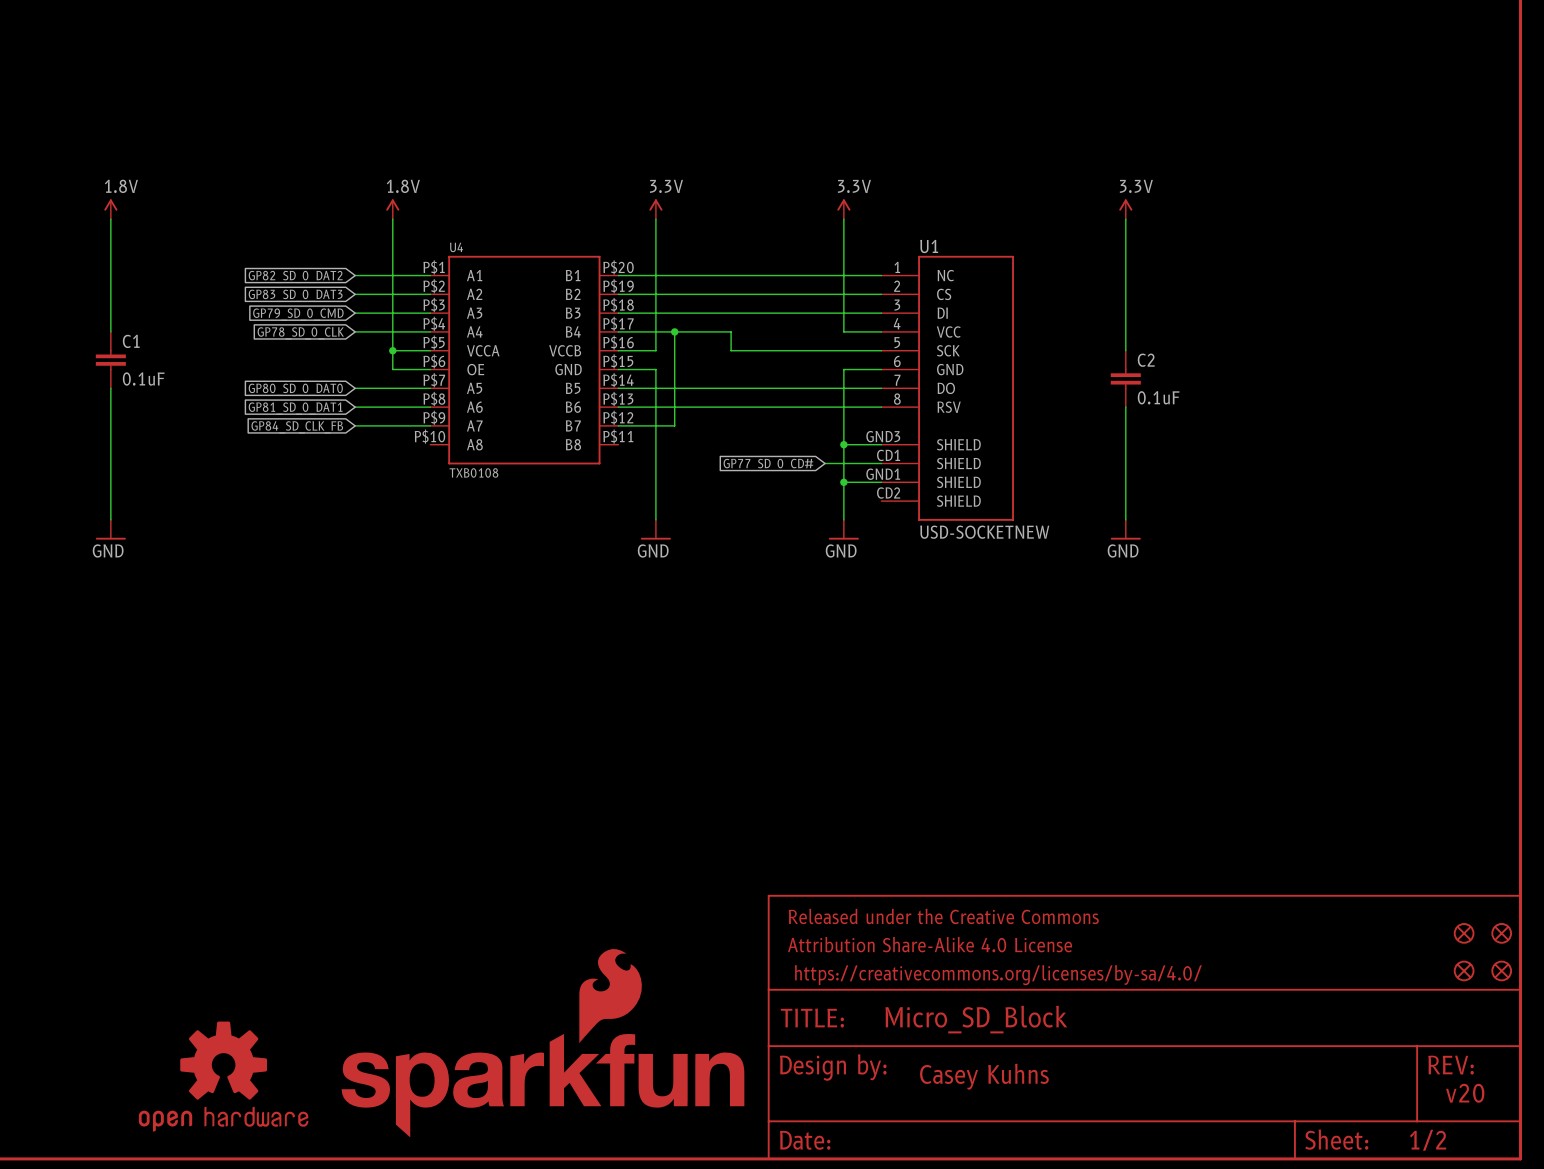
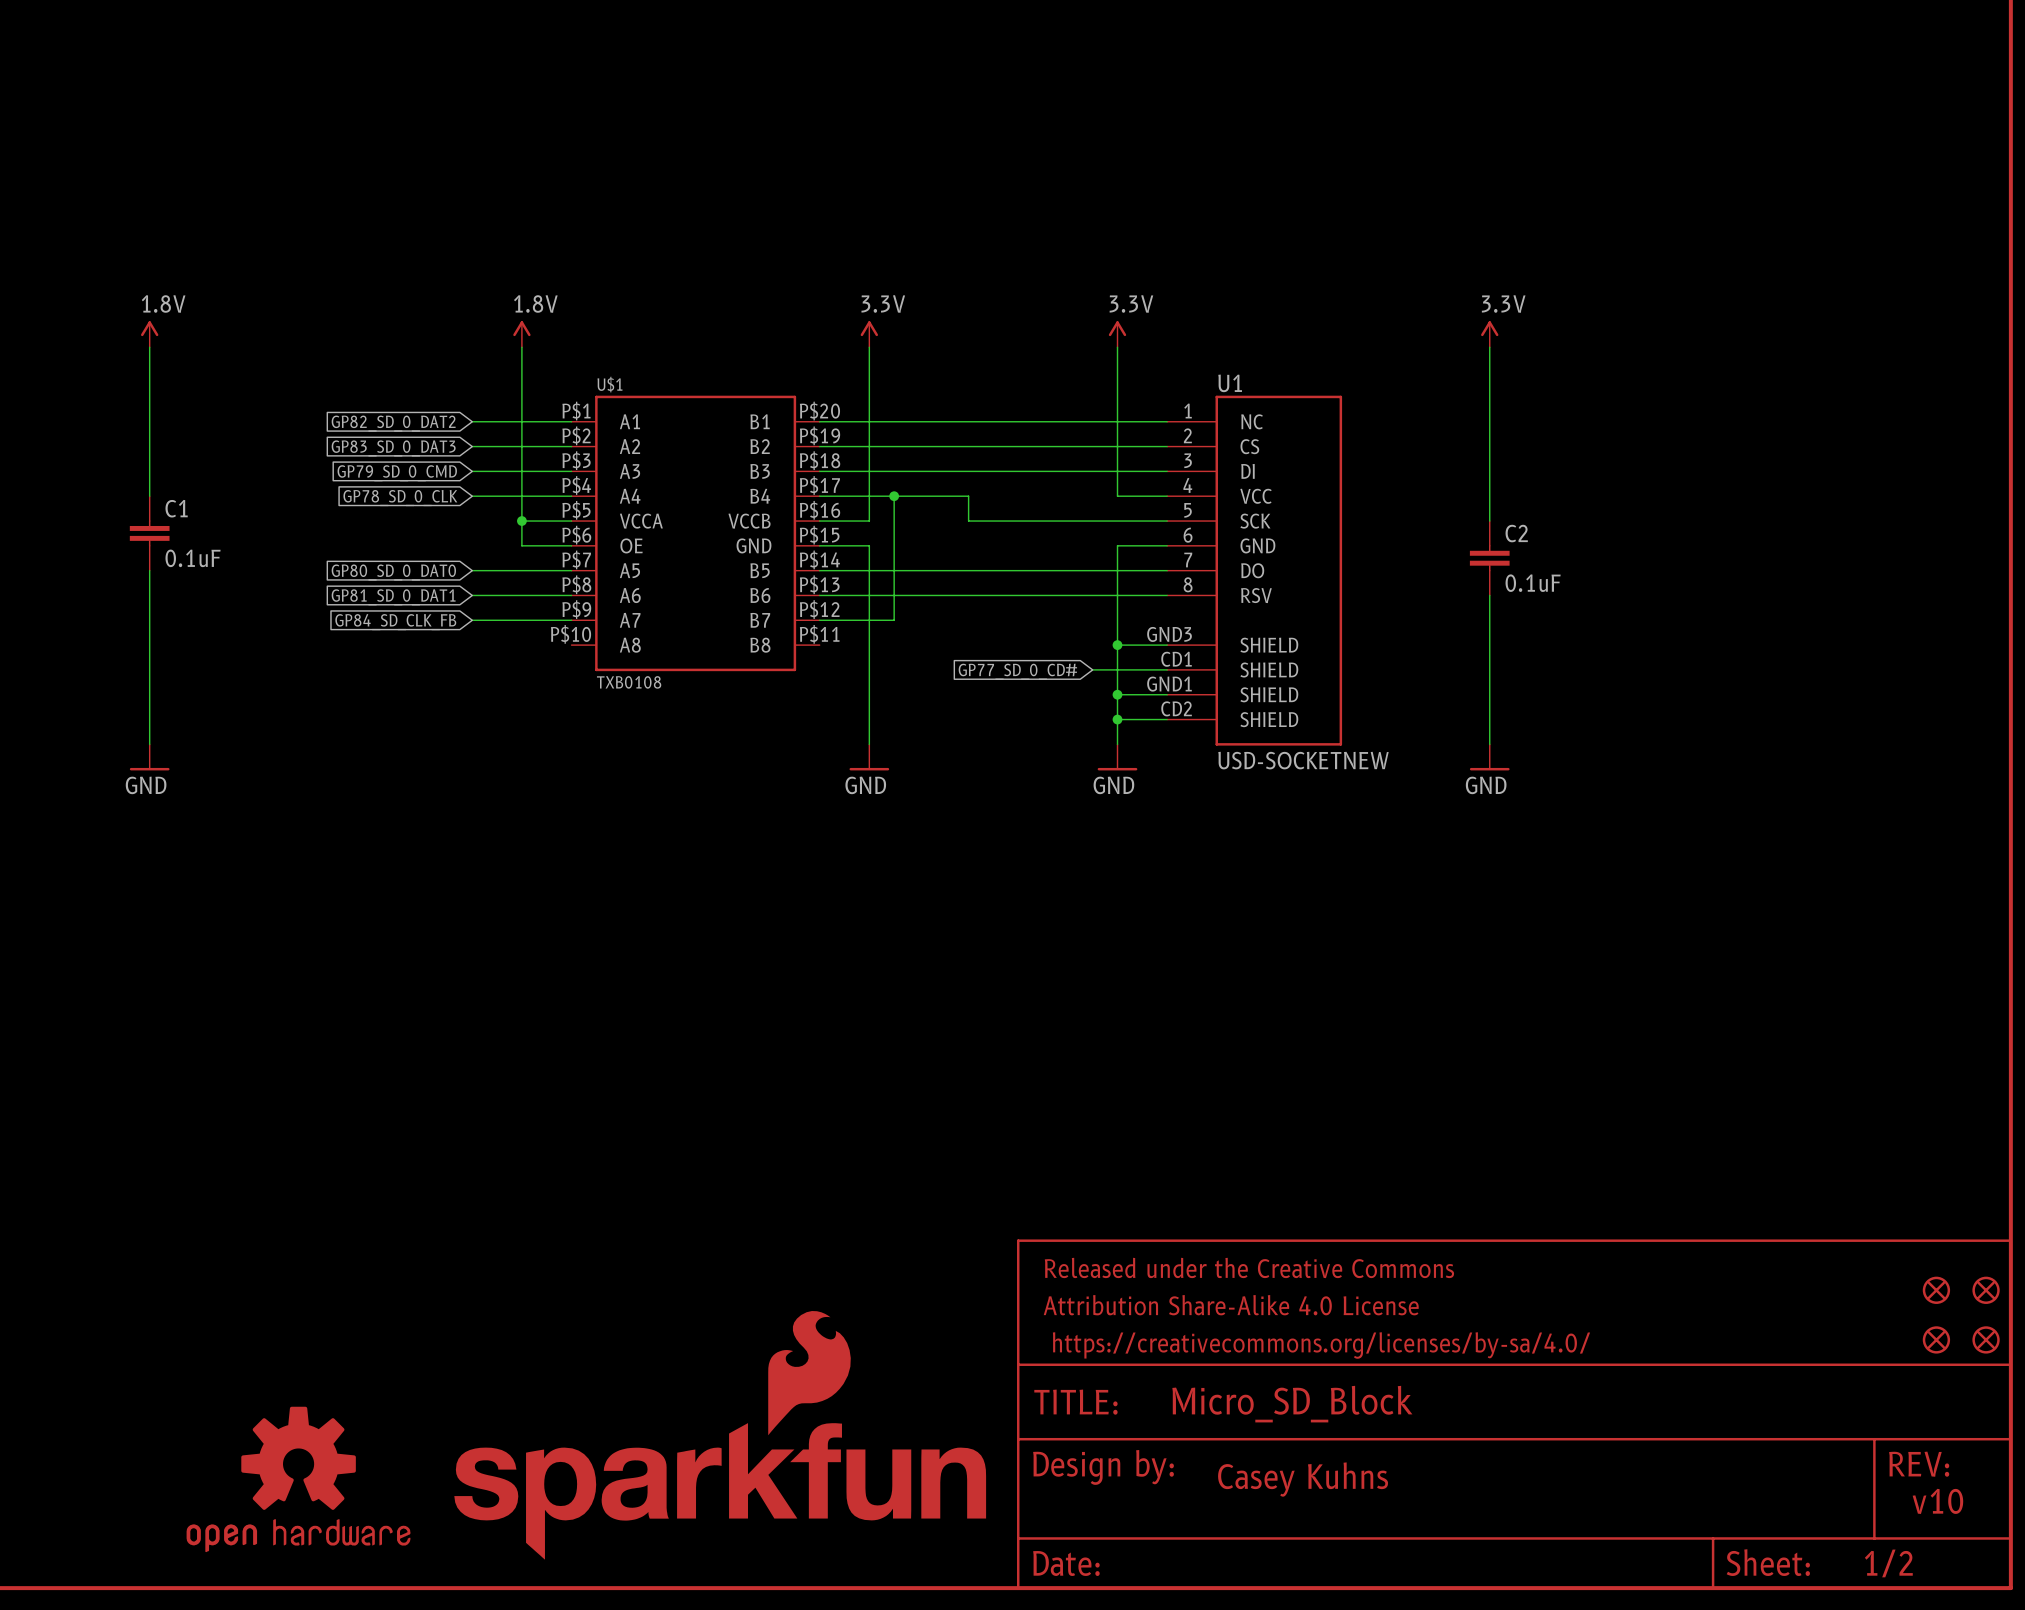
U4 name: U4 (456, 247) -> U$1 (609, 384)
wire: none -> (1117, 719) (1167, 719)
junction: none -> (1117, 719)
text: v20 (1465, 1093) -> v10 (1937, 1501)

